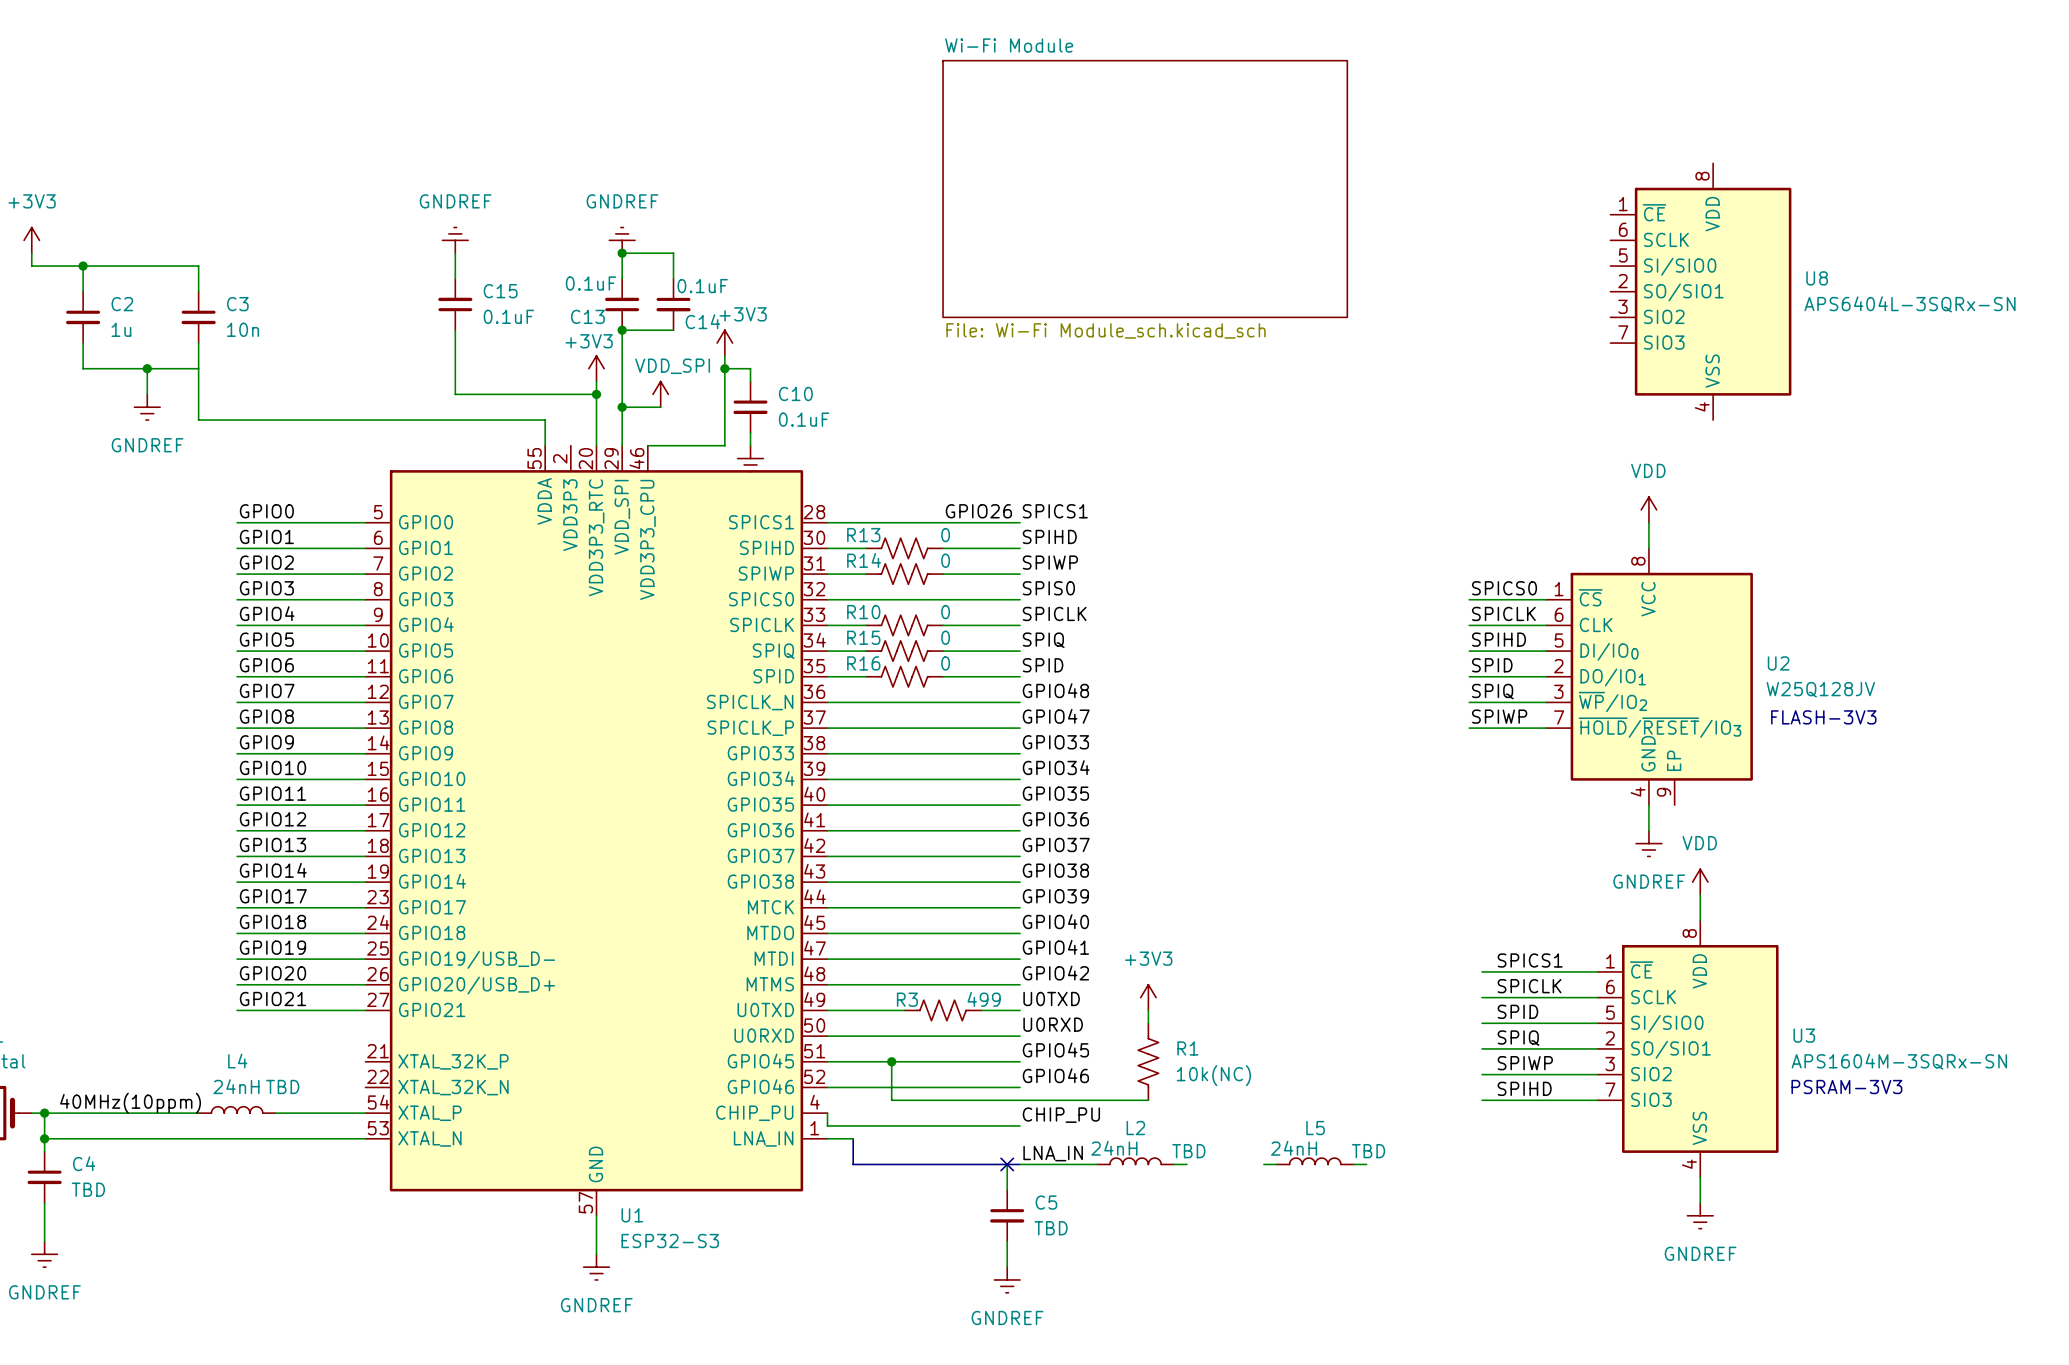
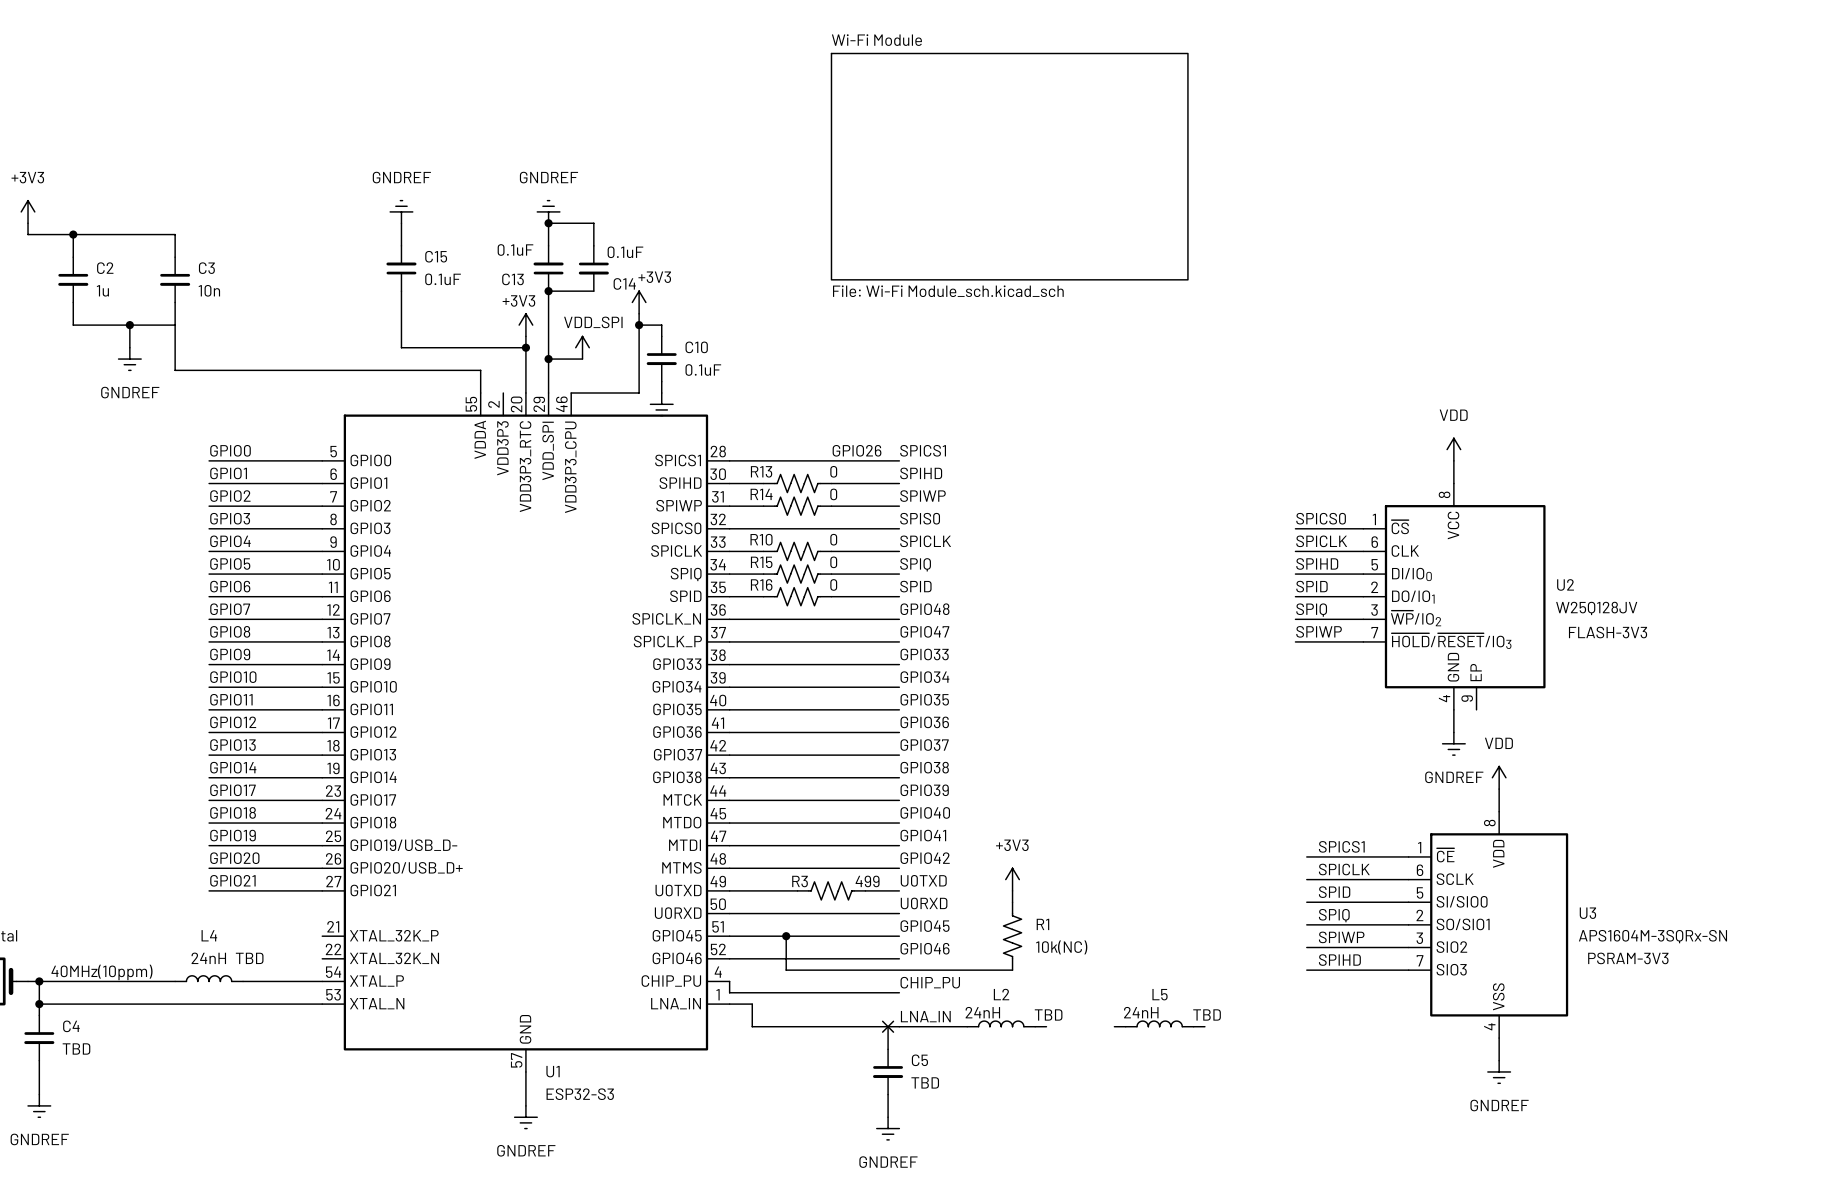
U8: APS6404L-3SQRx-SN (1700, 291) -> none

